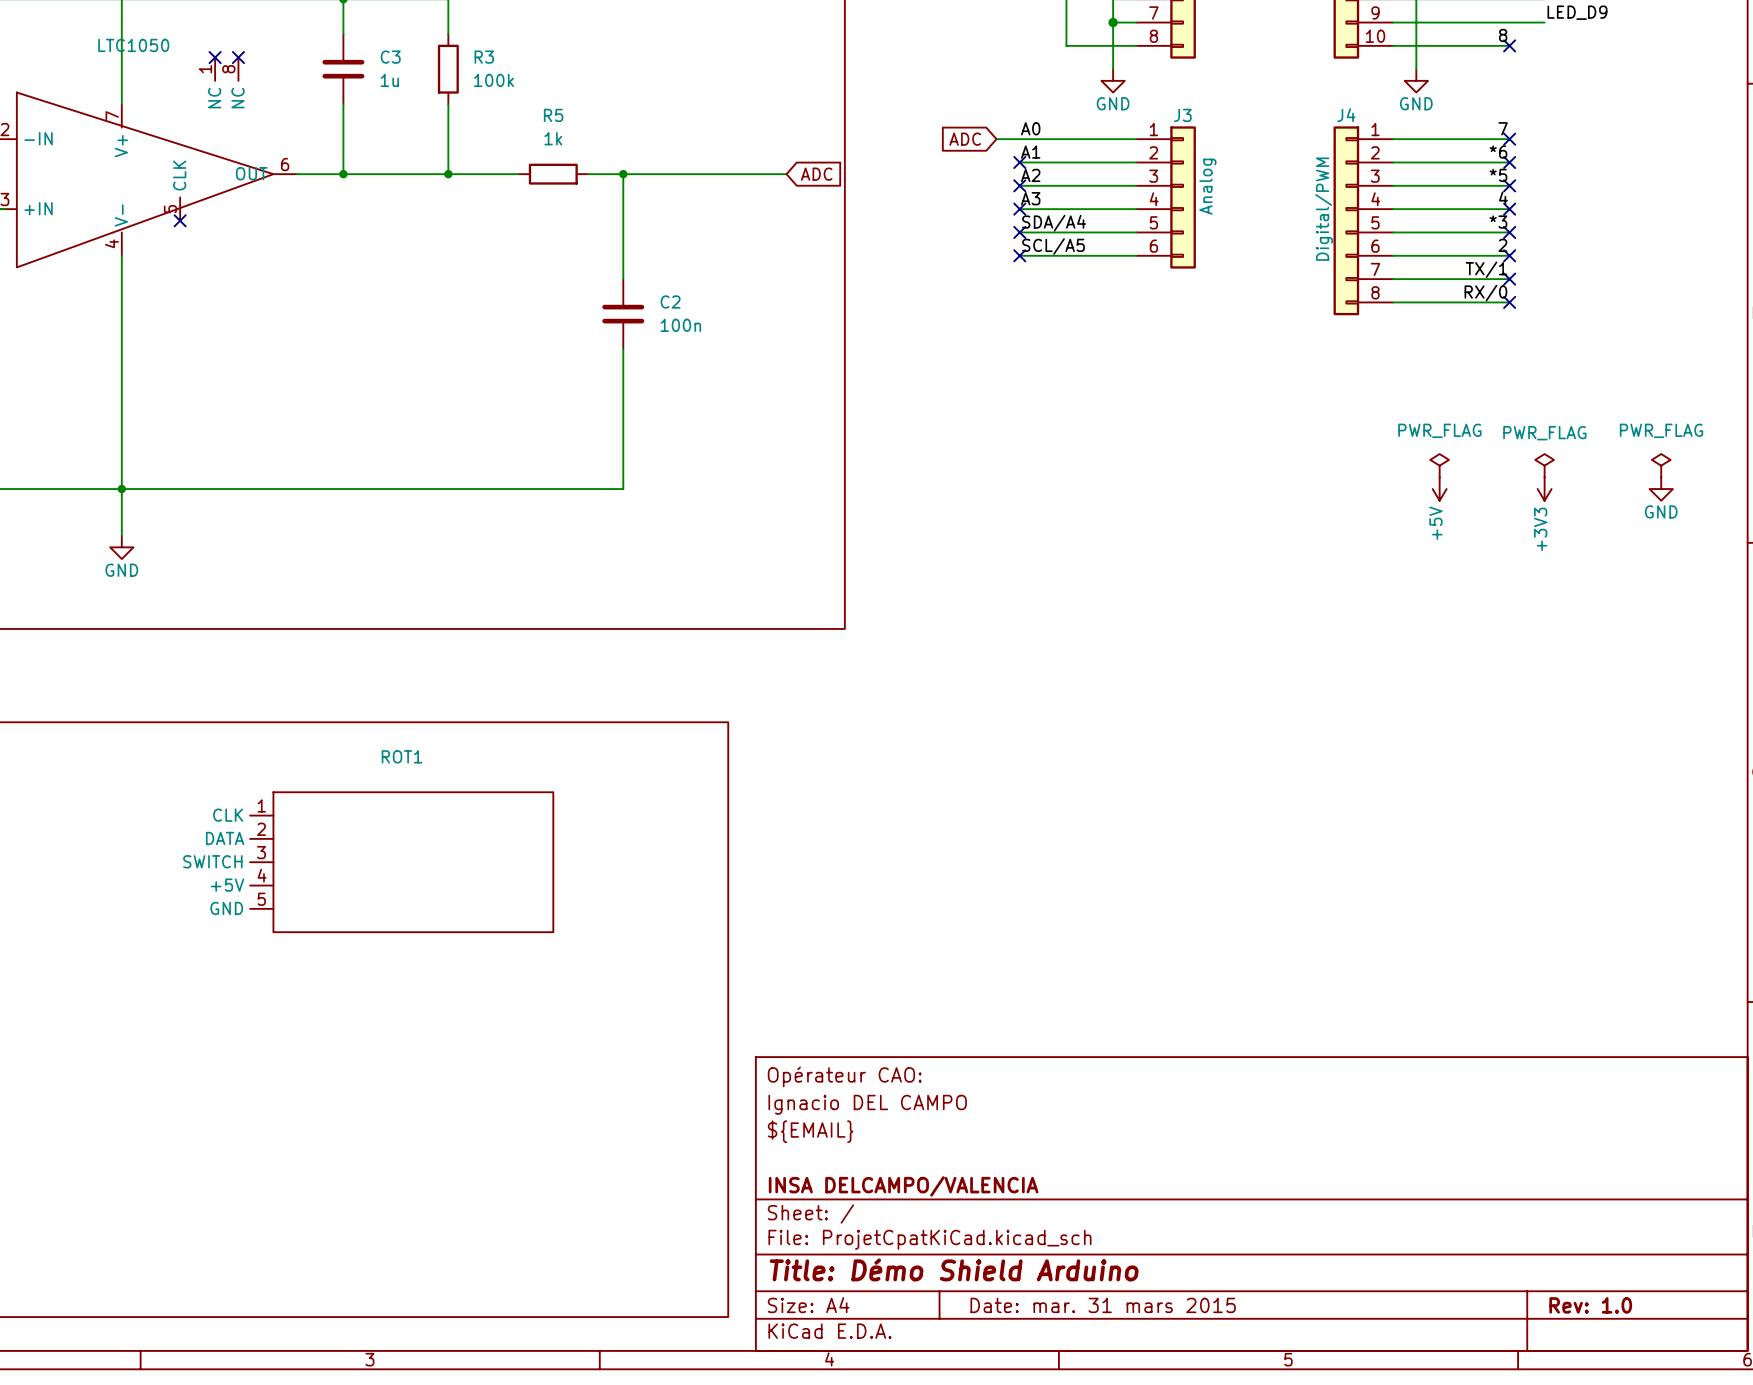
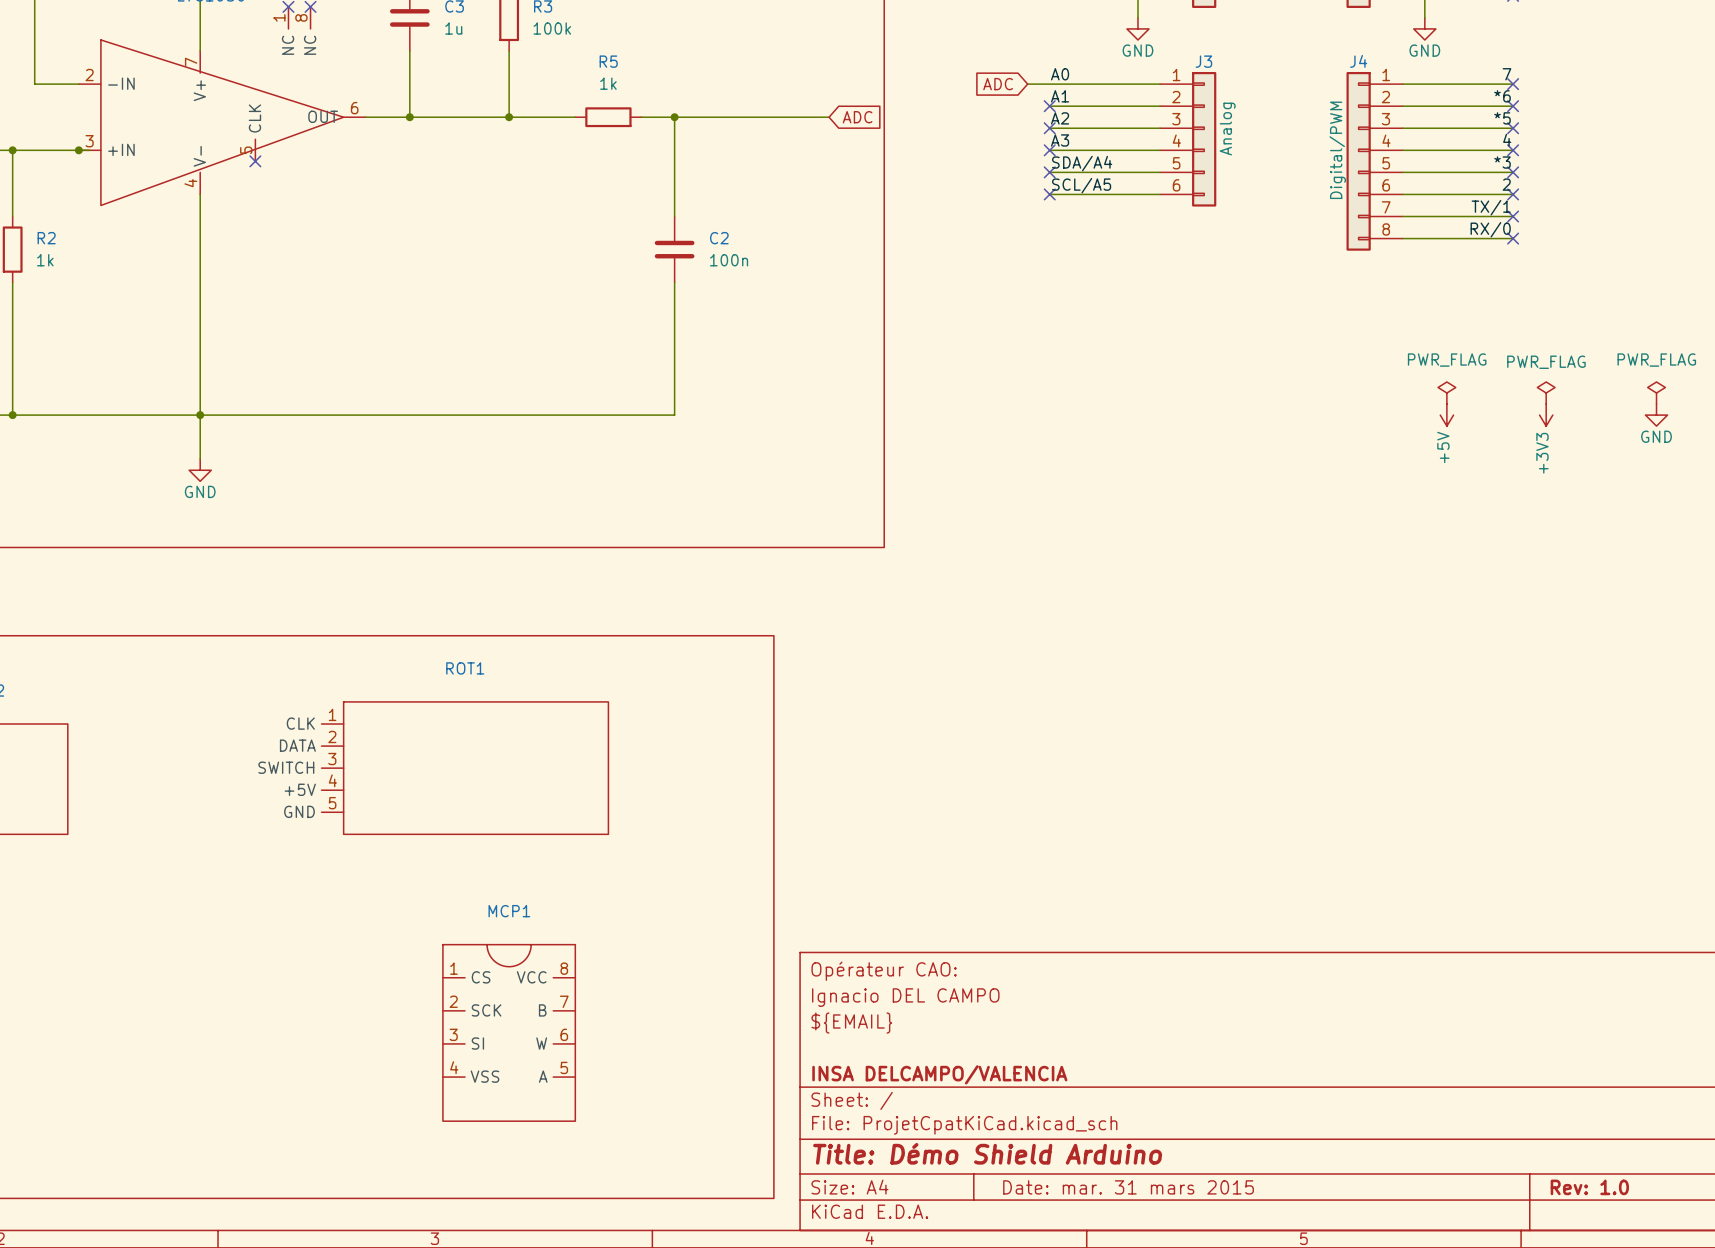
MCP1: none -> (509, 1032)

